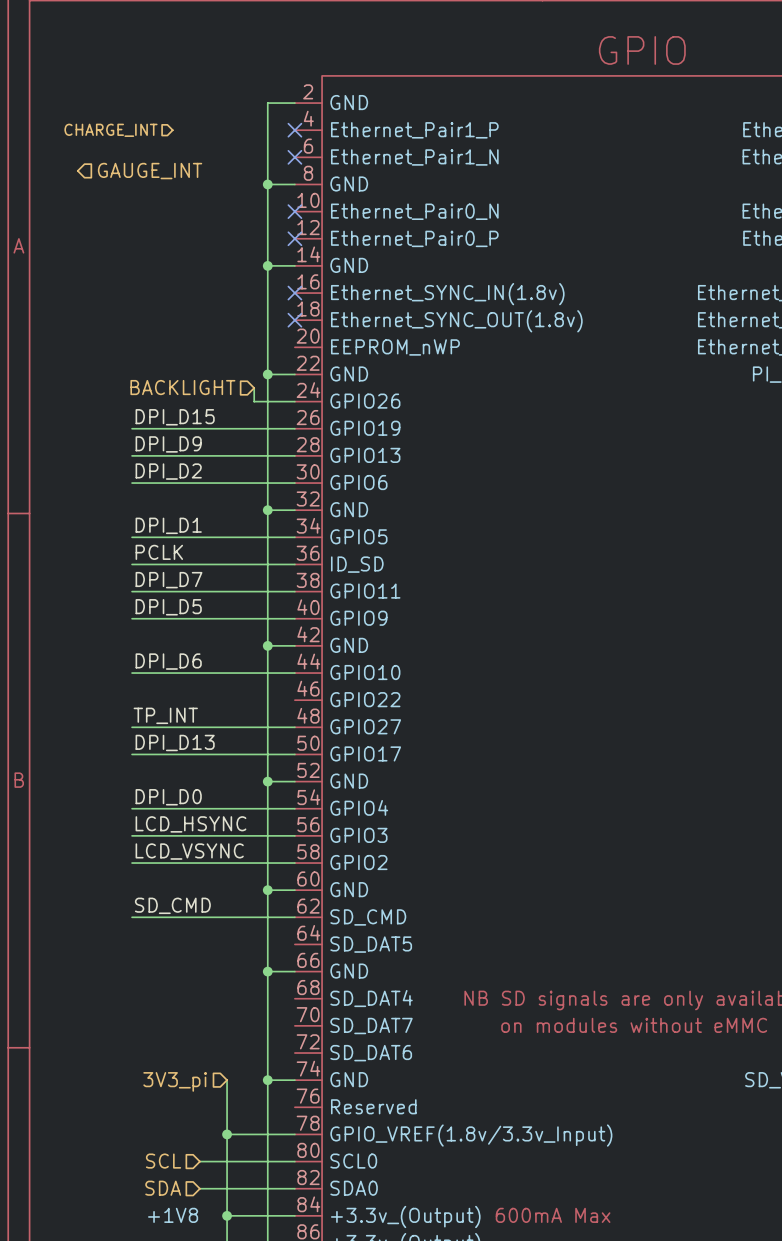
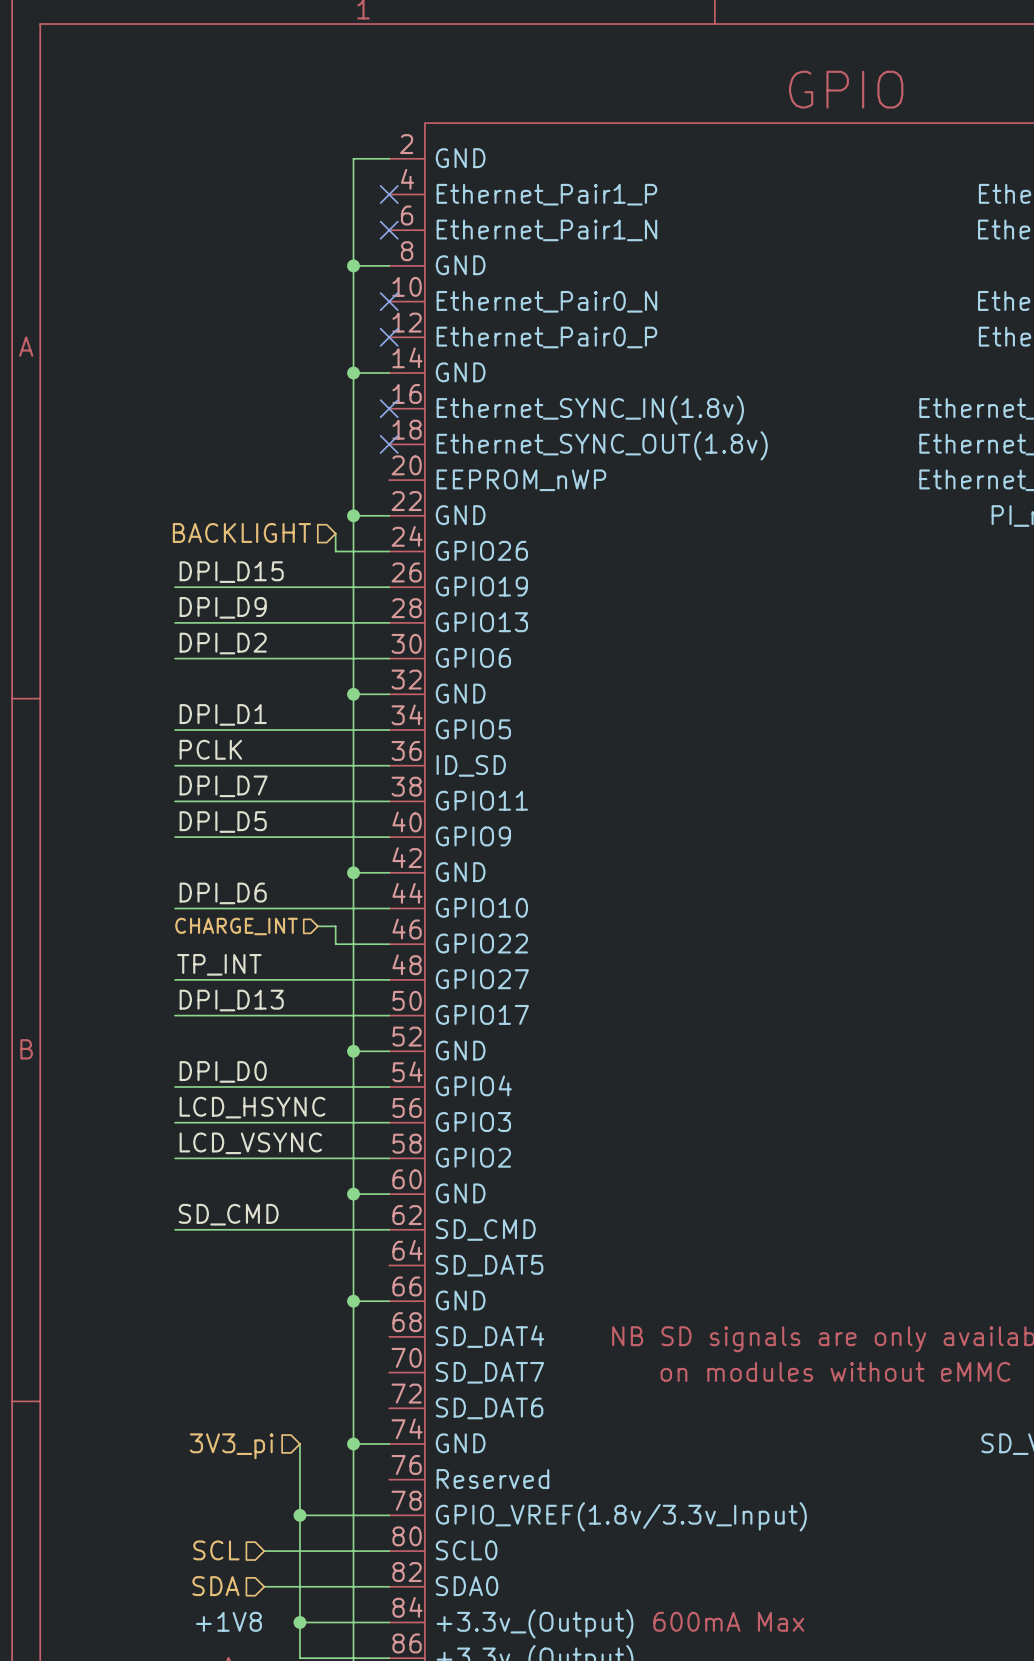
hierarchical label: CHARGE_INT (110, 130) -> none
hierarchical label: GAUGE_INT (150, 171) -> none
hierarchical label: none -> CHARGE_INT (236, 926)
wire: none -> (317, 926) (335, 926) (335, 944) (389, 944)

